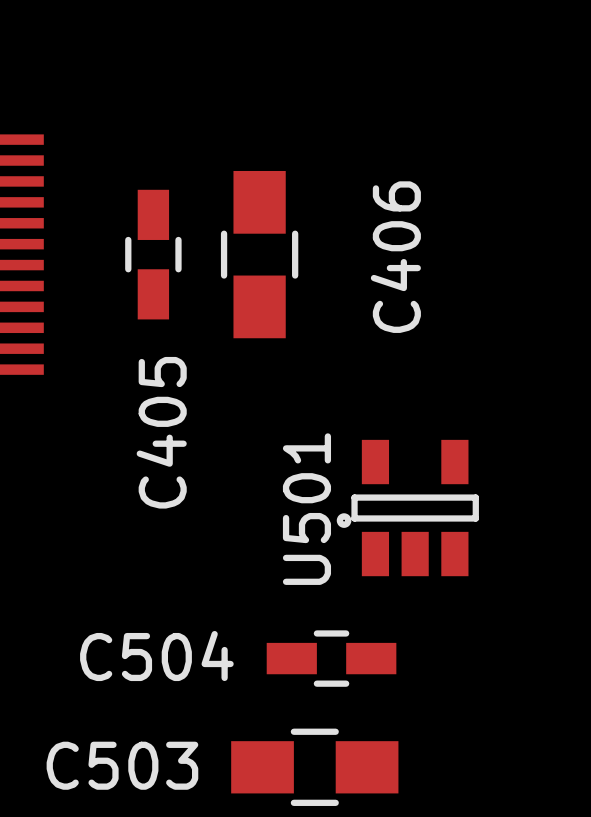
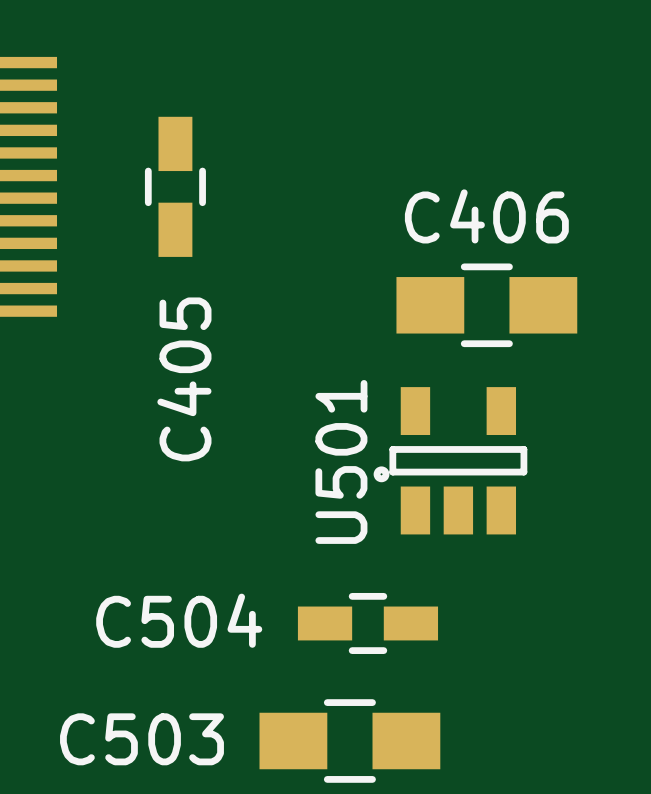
C406 rotation: 0° (259, 254) -> 90° clockwise (486, 305)
C406 position: (259, 254) -> (486, 305)
C406 name position: C406 (395, 257) -> C406 (486, 216)

